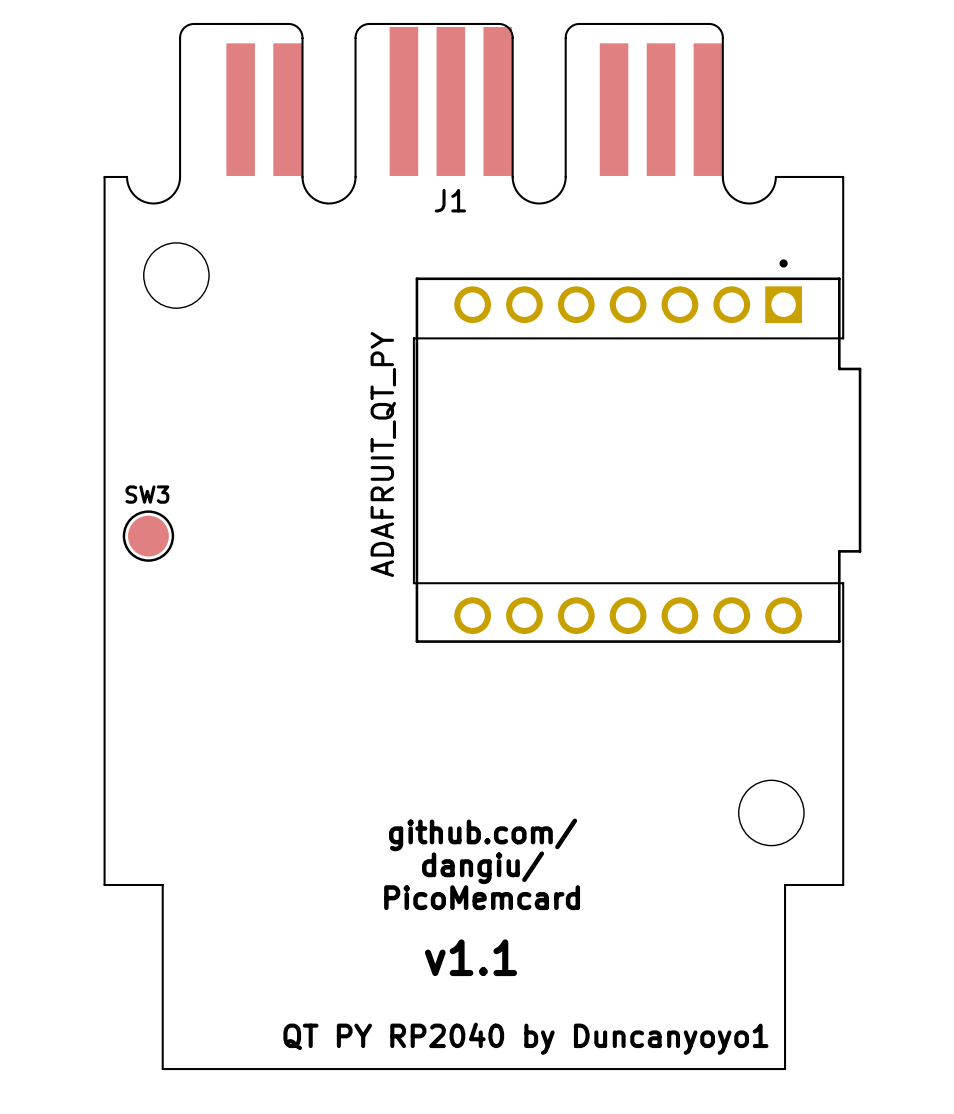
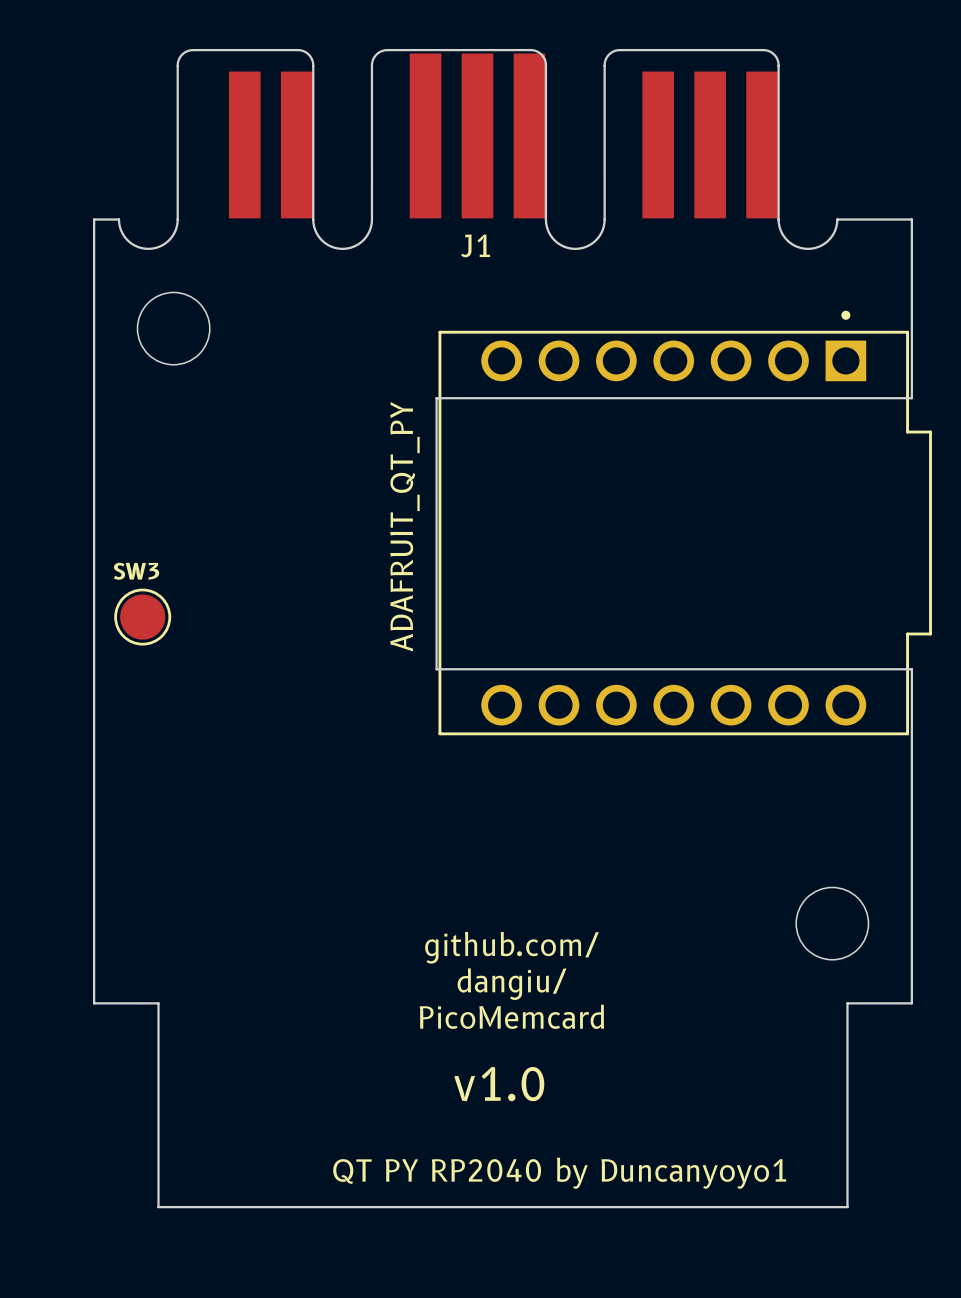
text: v1.1 (470, 957) -> v1.0 (499, 1084)

